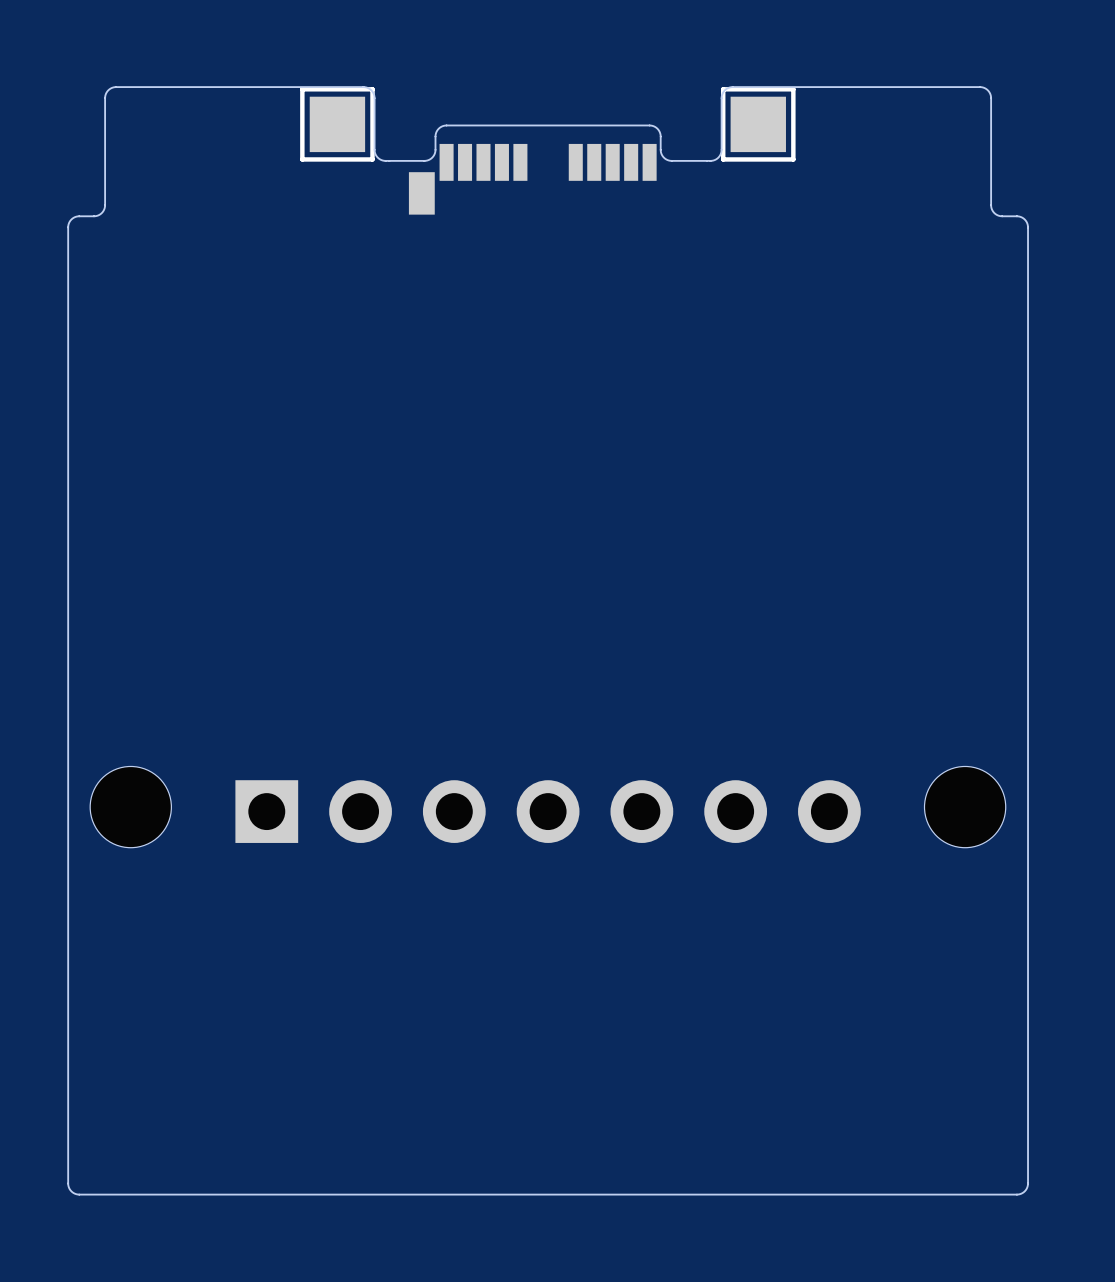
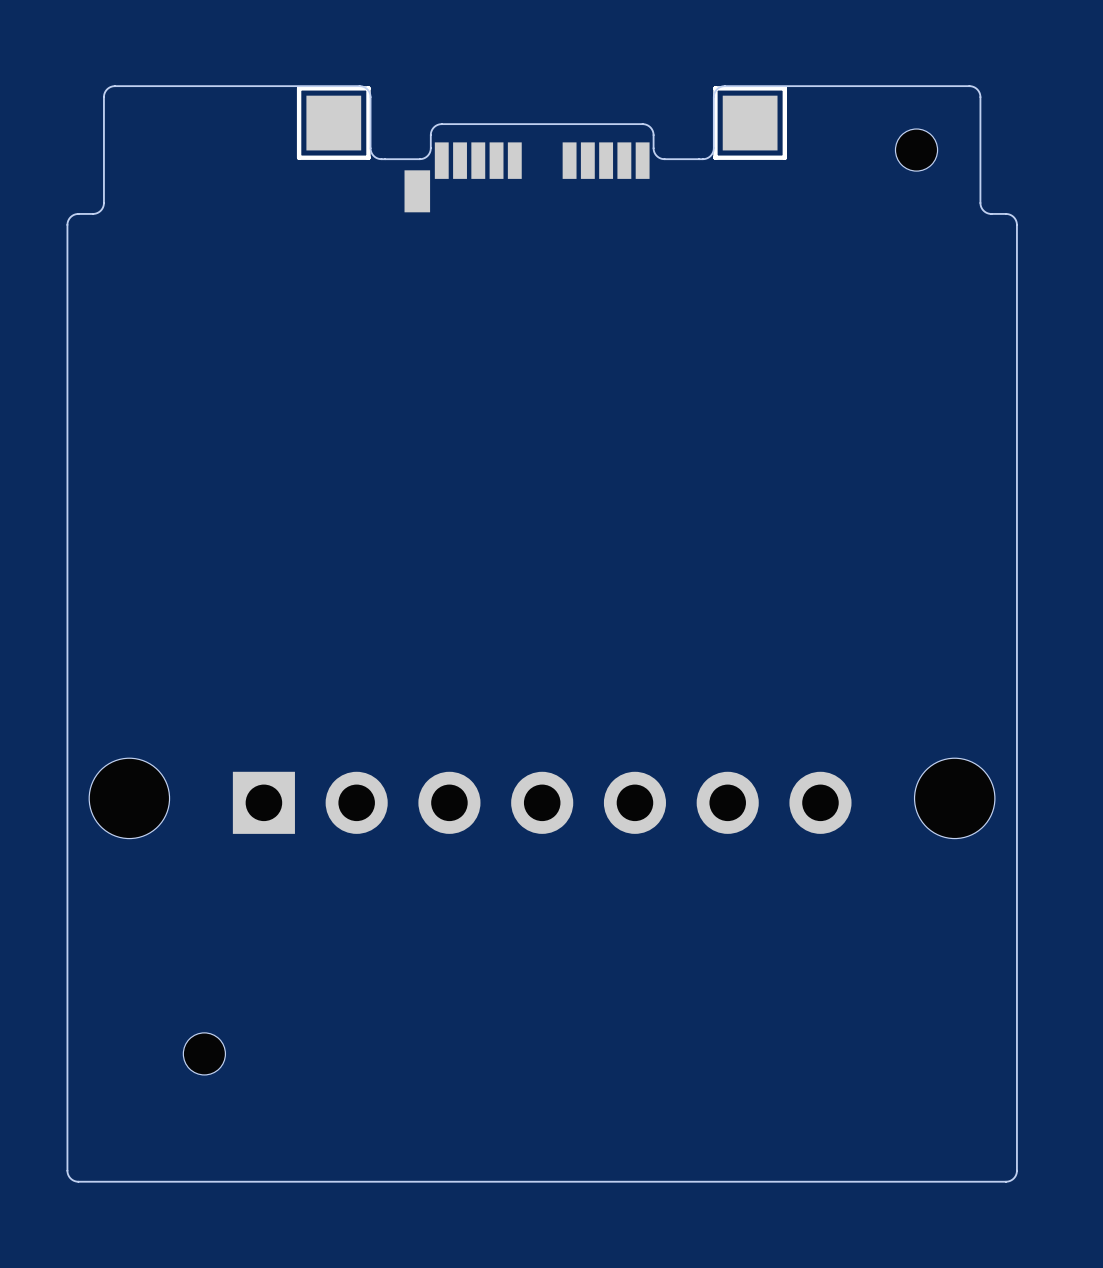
part: none -> (916, 150)
part: none -> (204, 1053)

